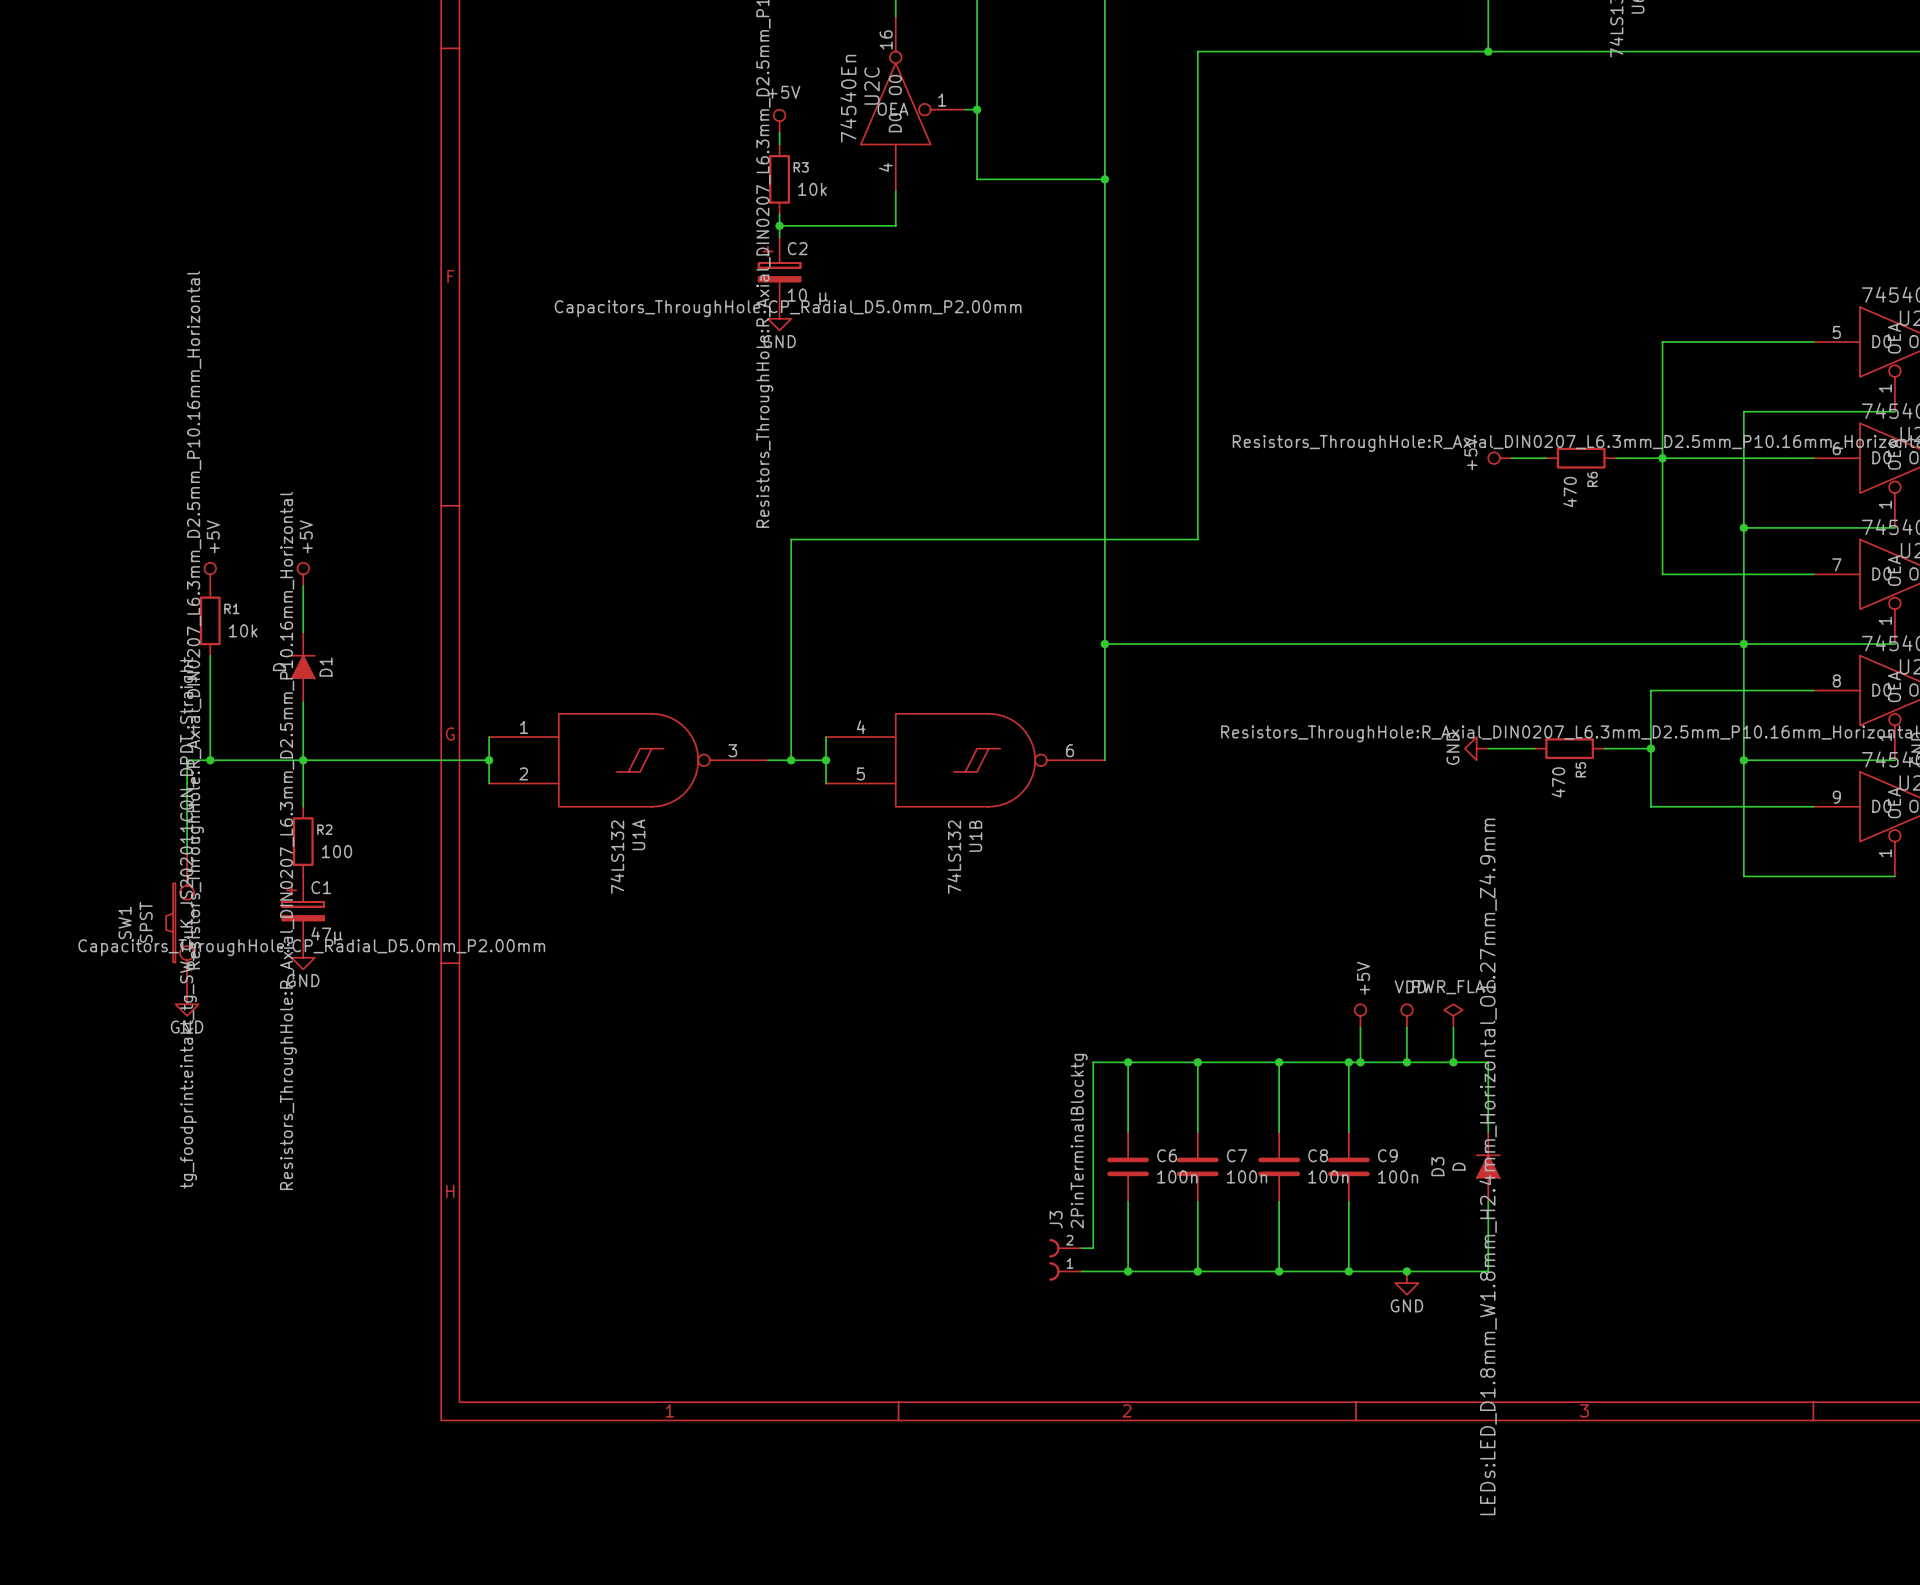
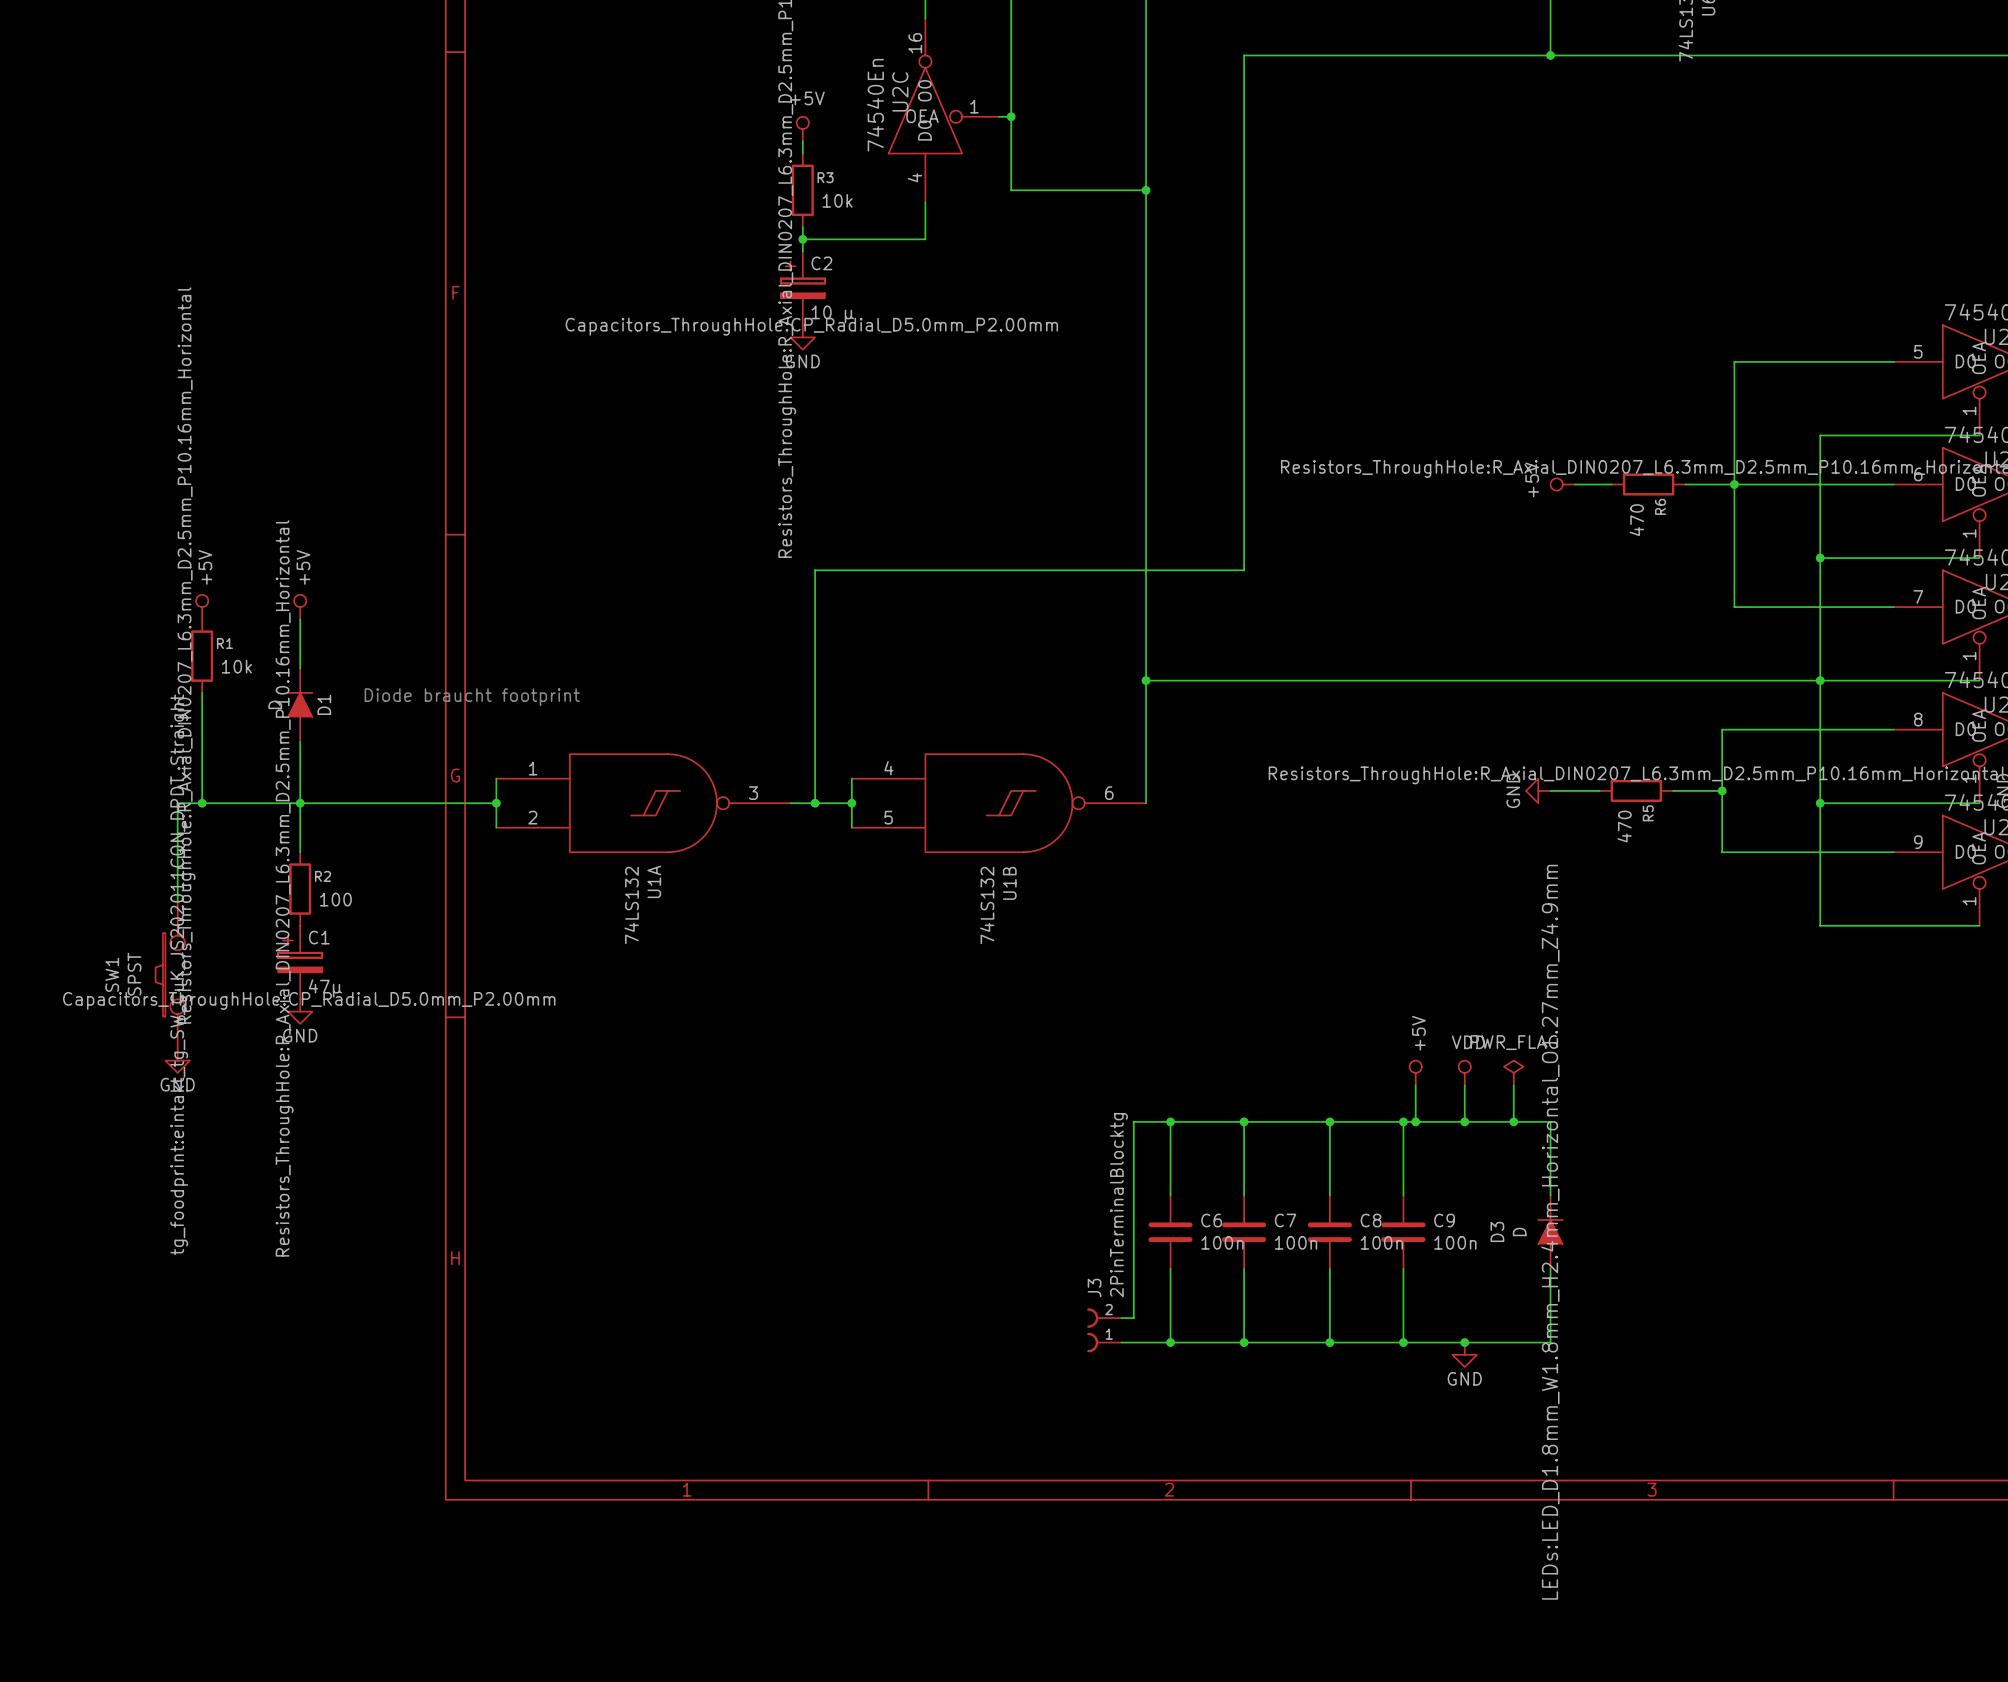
text: none -> Diode braucht footprint (472, 697)

